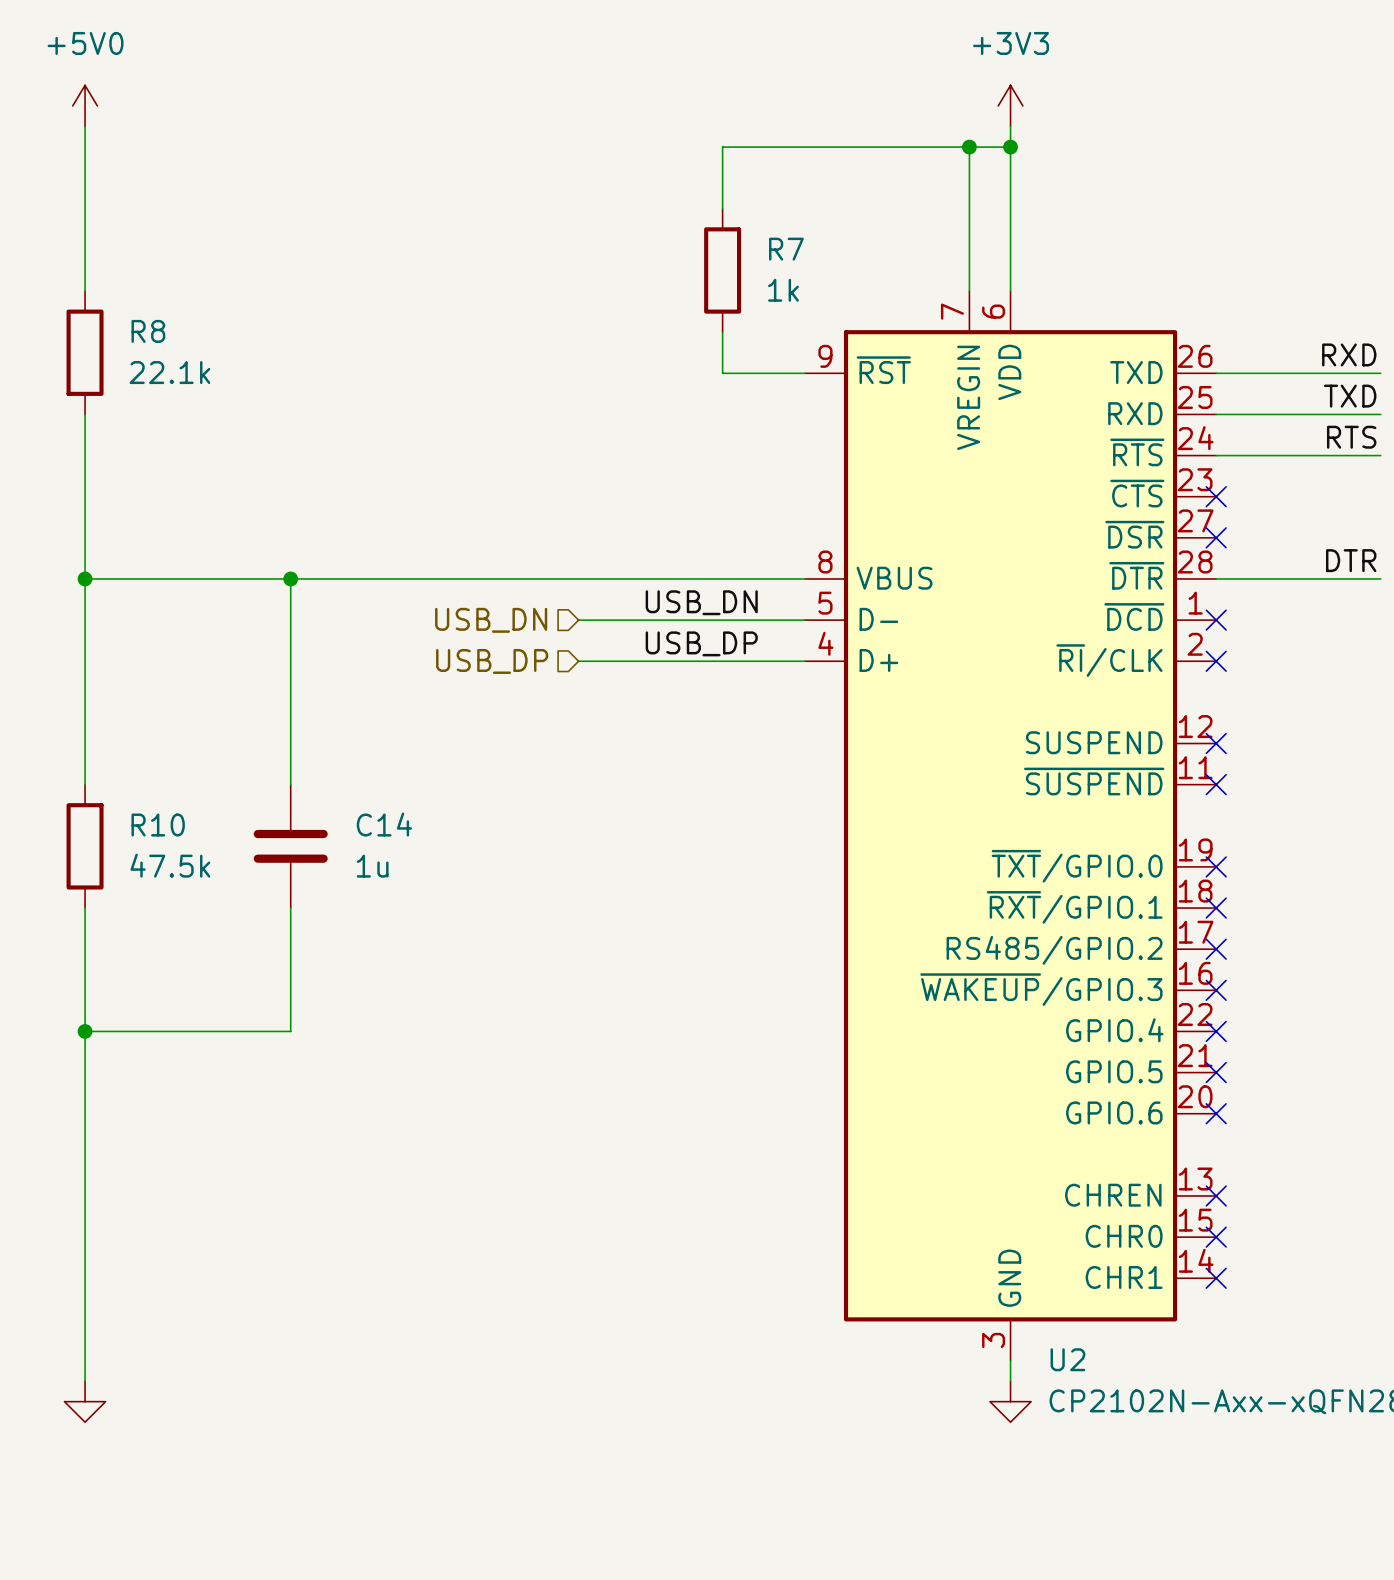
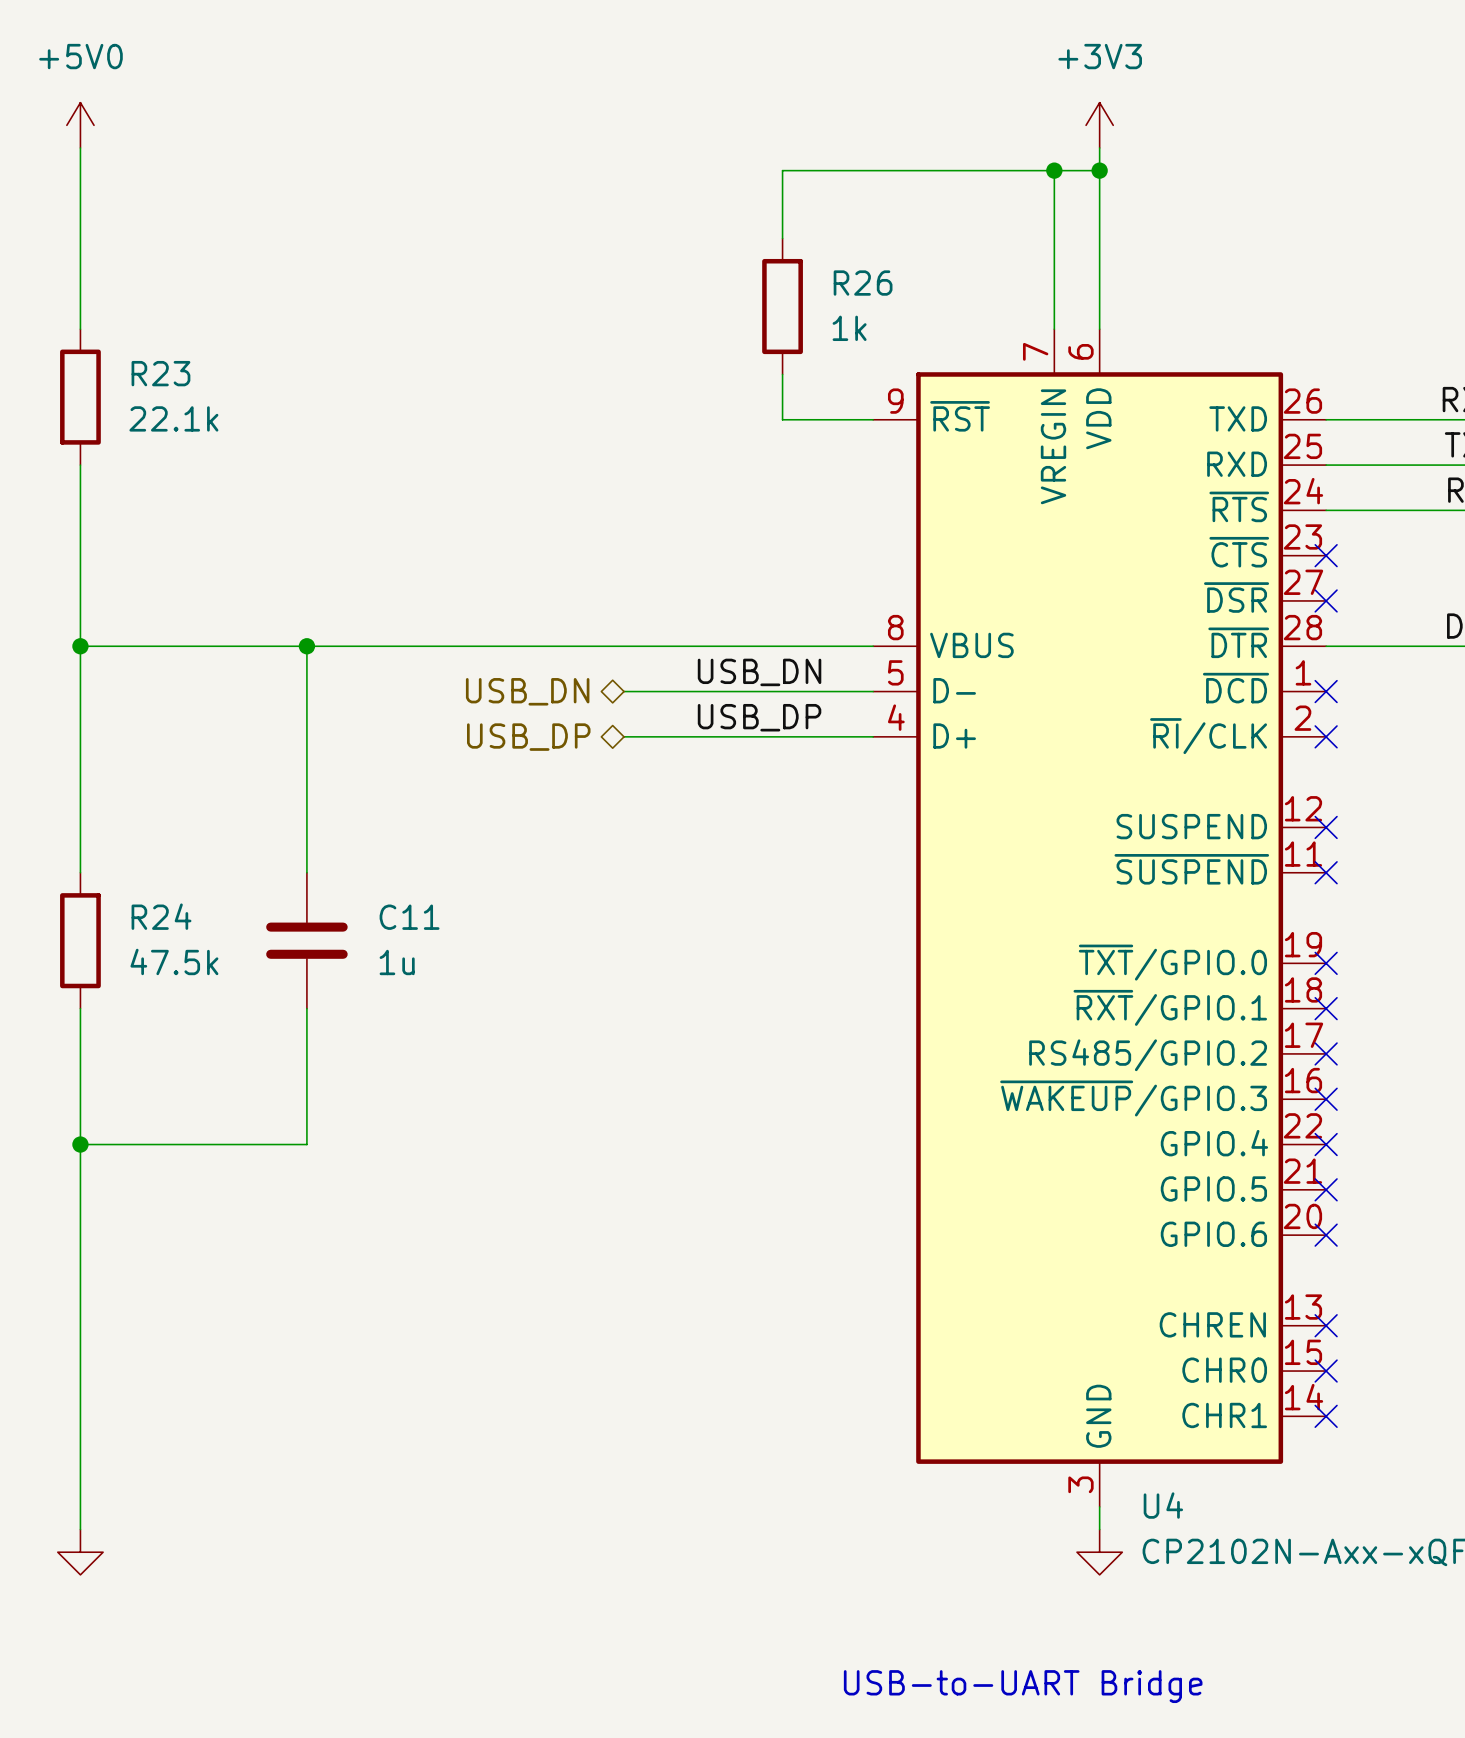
R7 name: R7 (786, 249) -> R26 (863, 283)
R8 name: R8 (148, 331) -> R23 (160, 373)
hierarchical label shape: input (491, 620) -> bidirectional (527, 691)
hierarchical label shape: input (492, 661) -> bidirectional (528, 737)
C14 name: C14 (384, 824) -> C11 (409, 917)
R10 name: R10 (158, 825) -> R24 (161, 916)
U2 name: U2 (1067, 1359) -> U4 (1163, 1505)
text: none -> USB-to-UART Bridge (1023, 1686)

